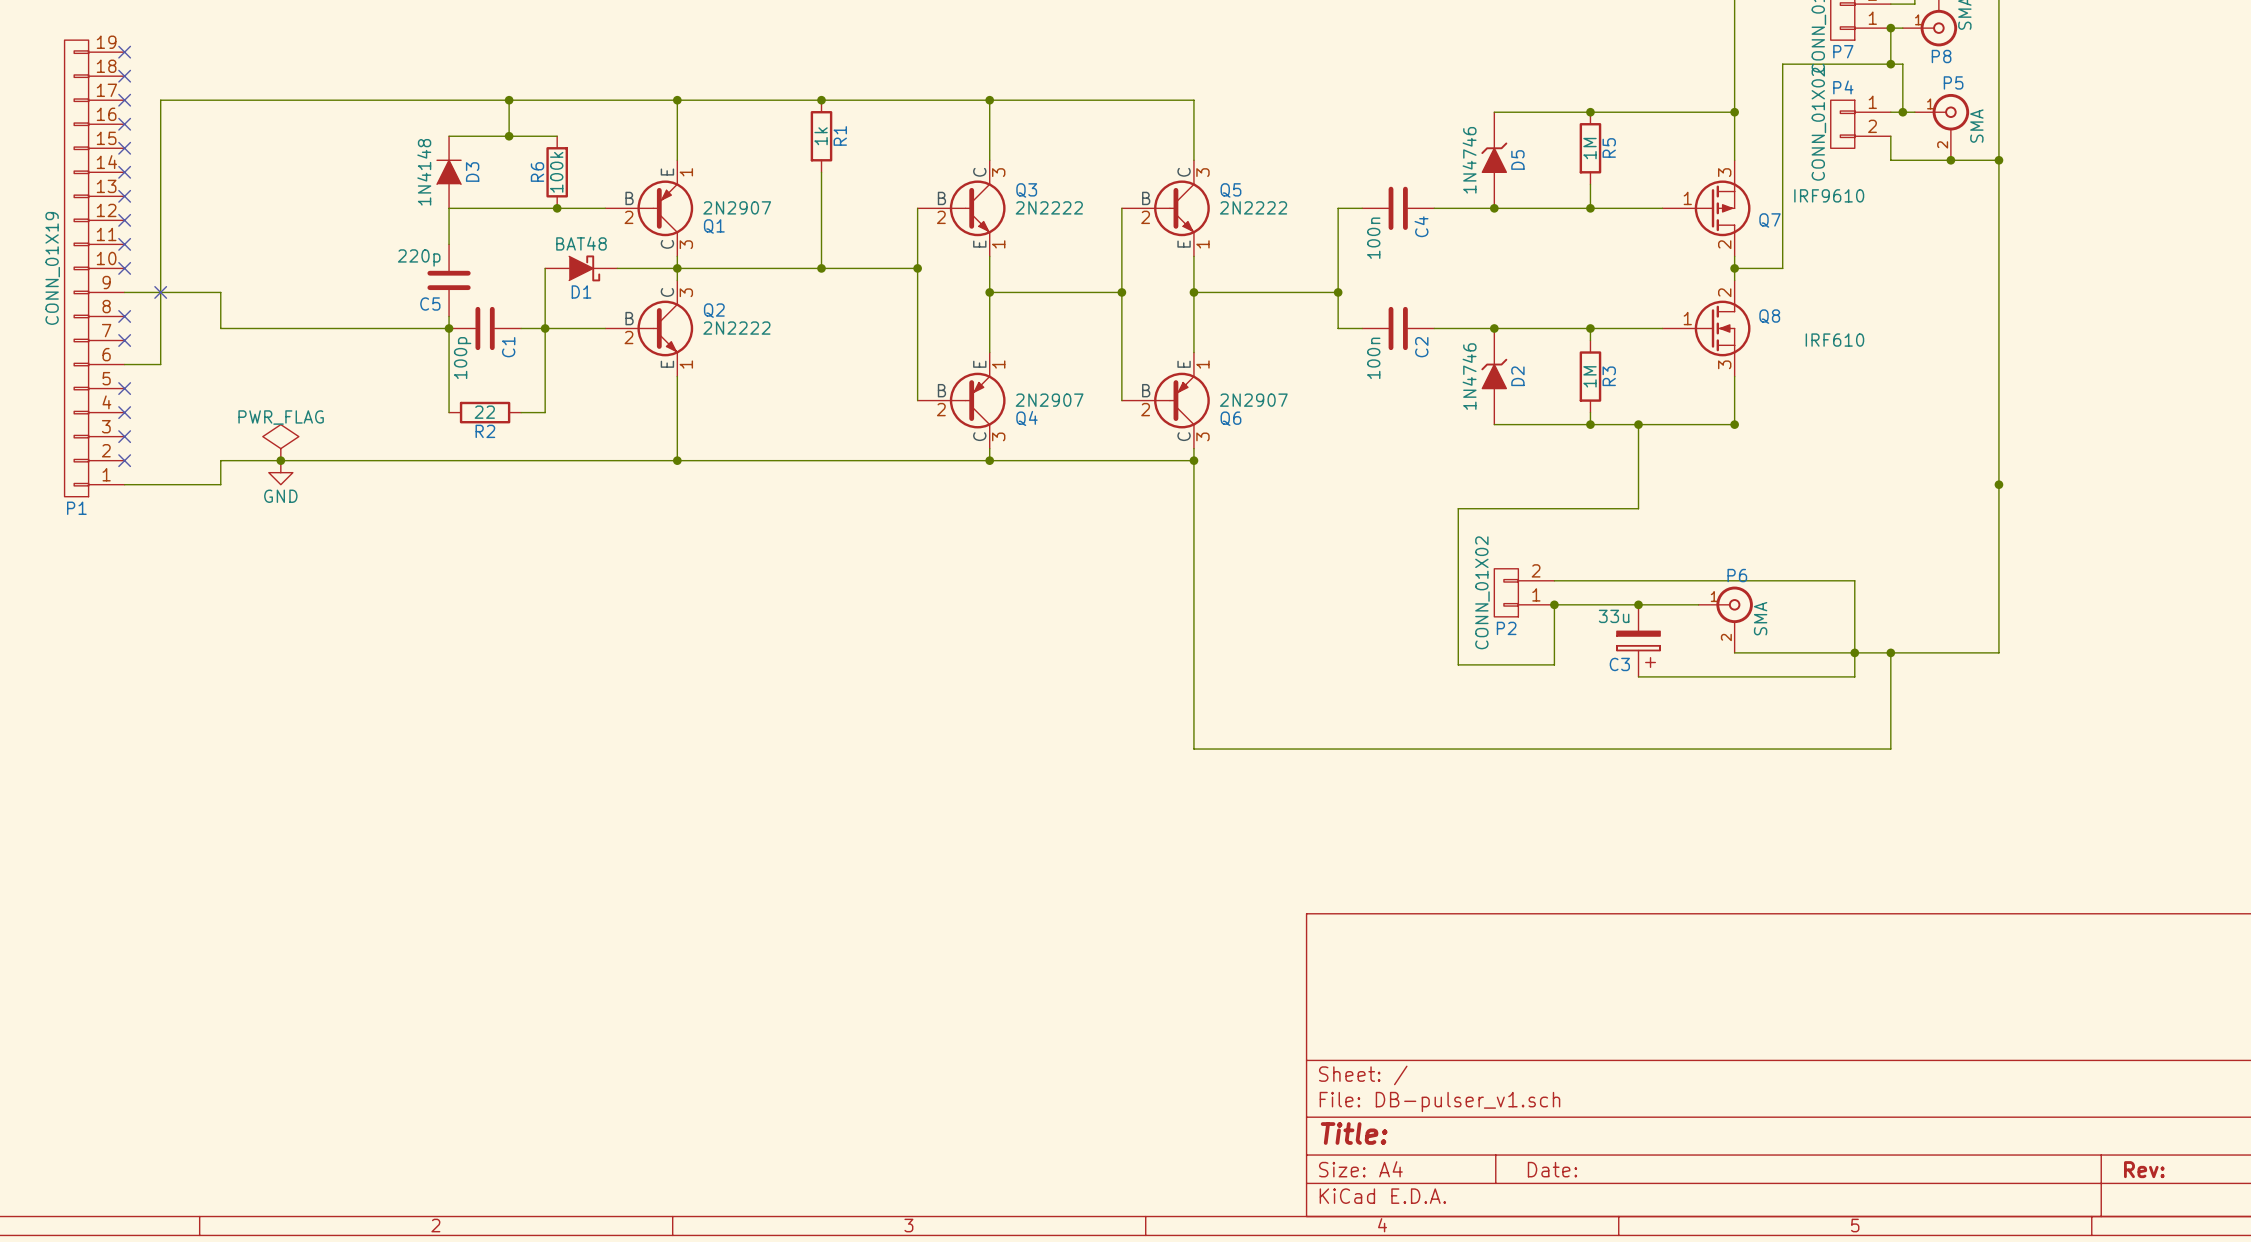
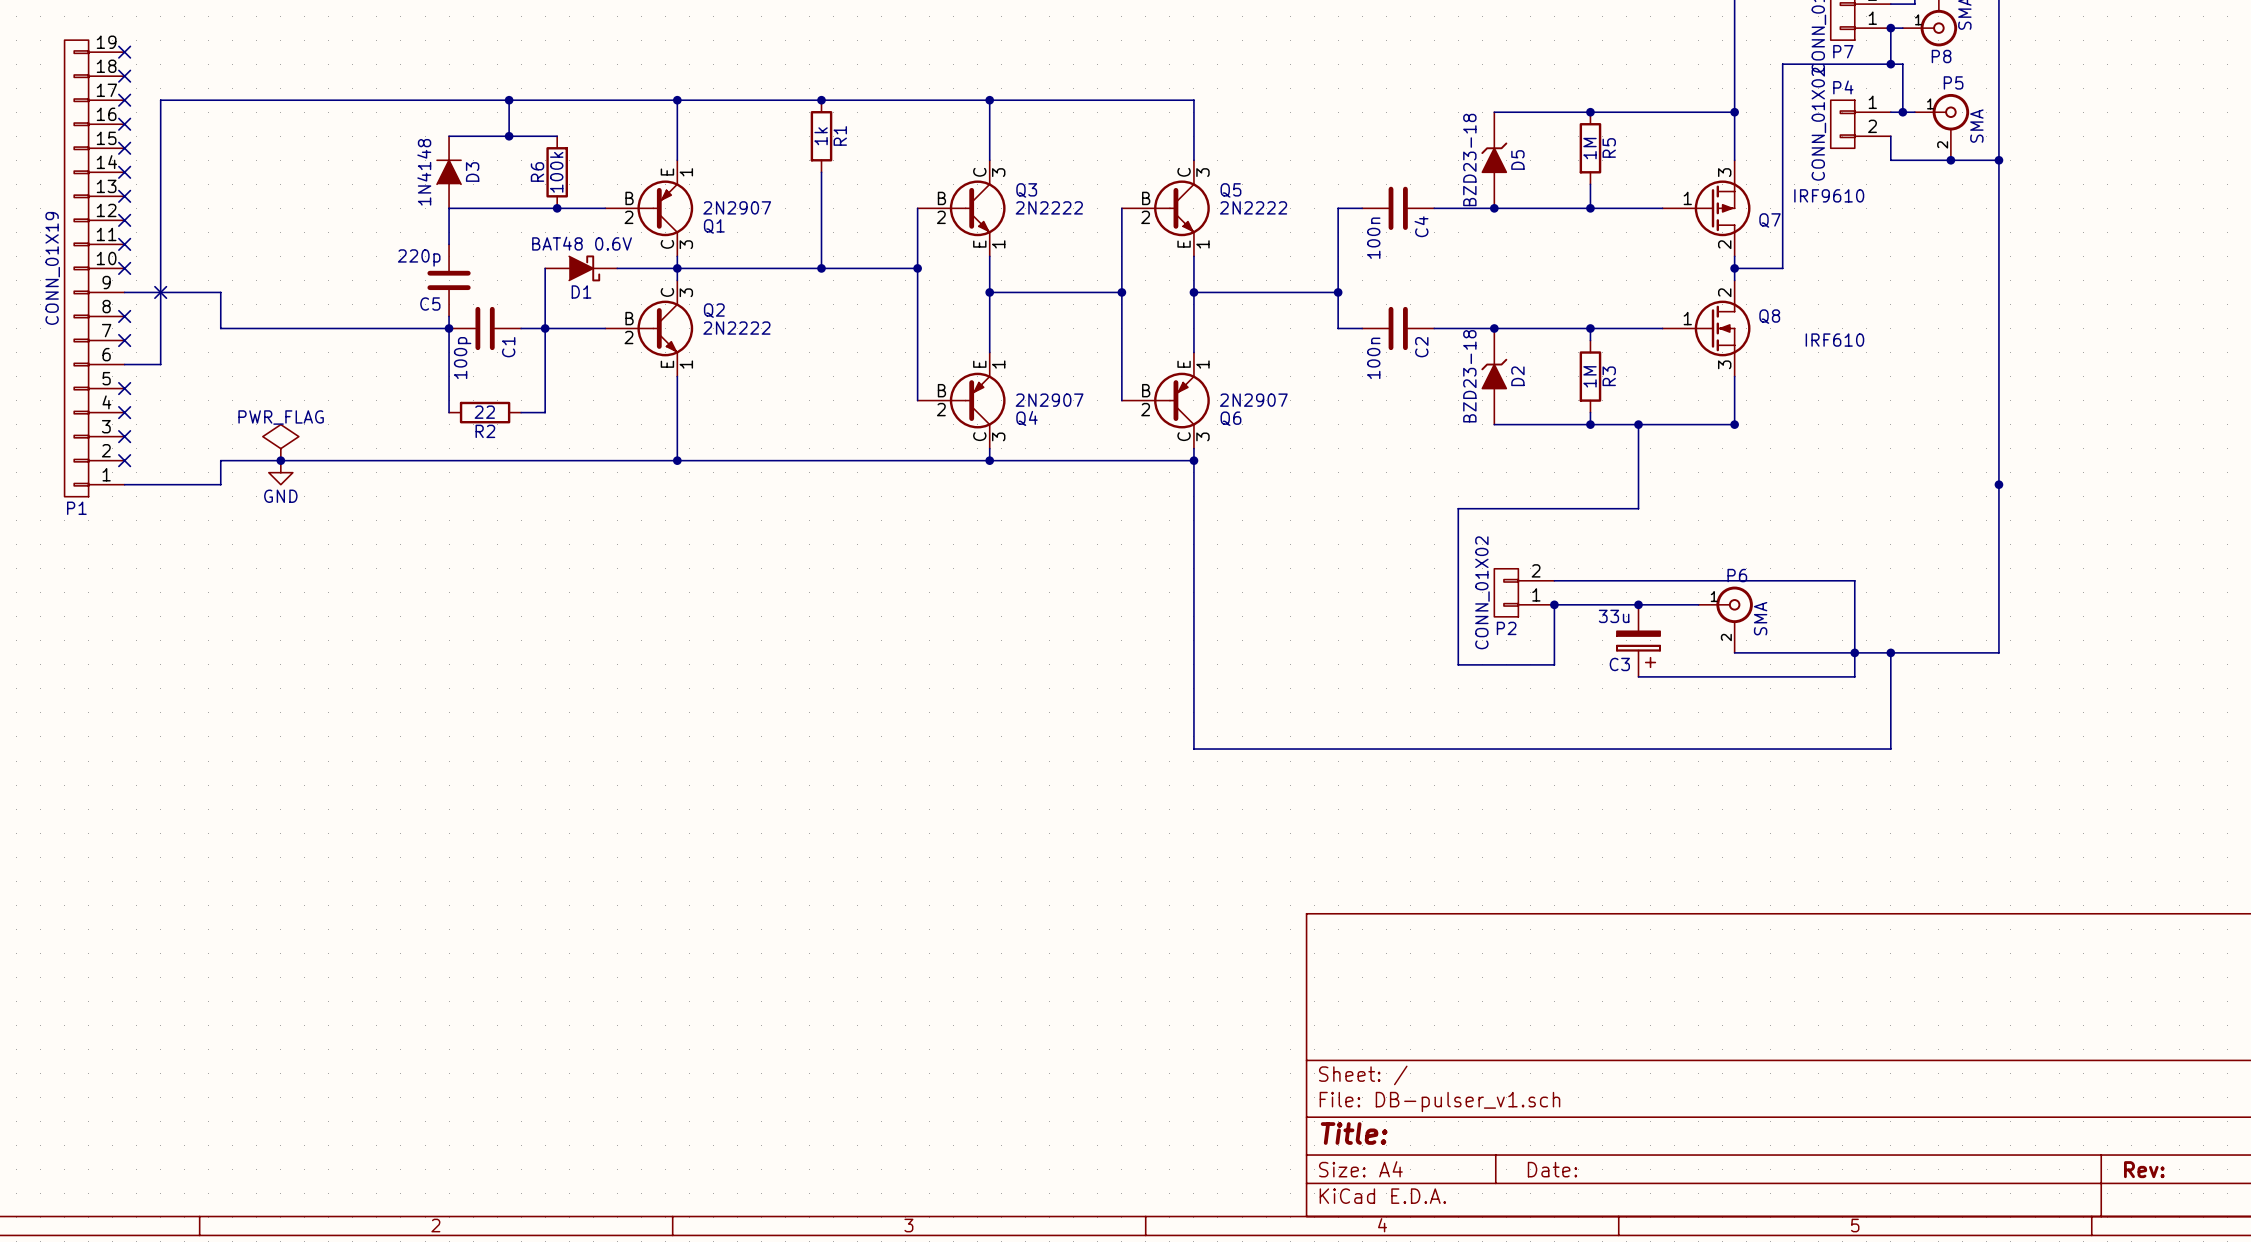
D5 value: 1N4746 (1469, 160) -> BZD23-18 (1469, 160)
D1 value: BAT48 (581, 243) -> BAT48 0.6V (582, 243)
D2 value: 1N4746 (1469, 376) -> BZD23-18 (1469, 376)

